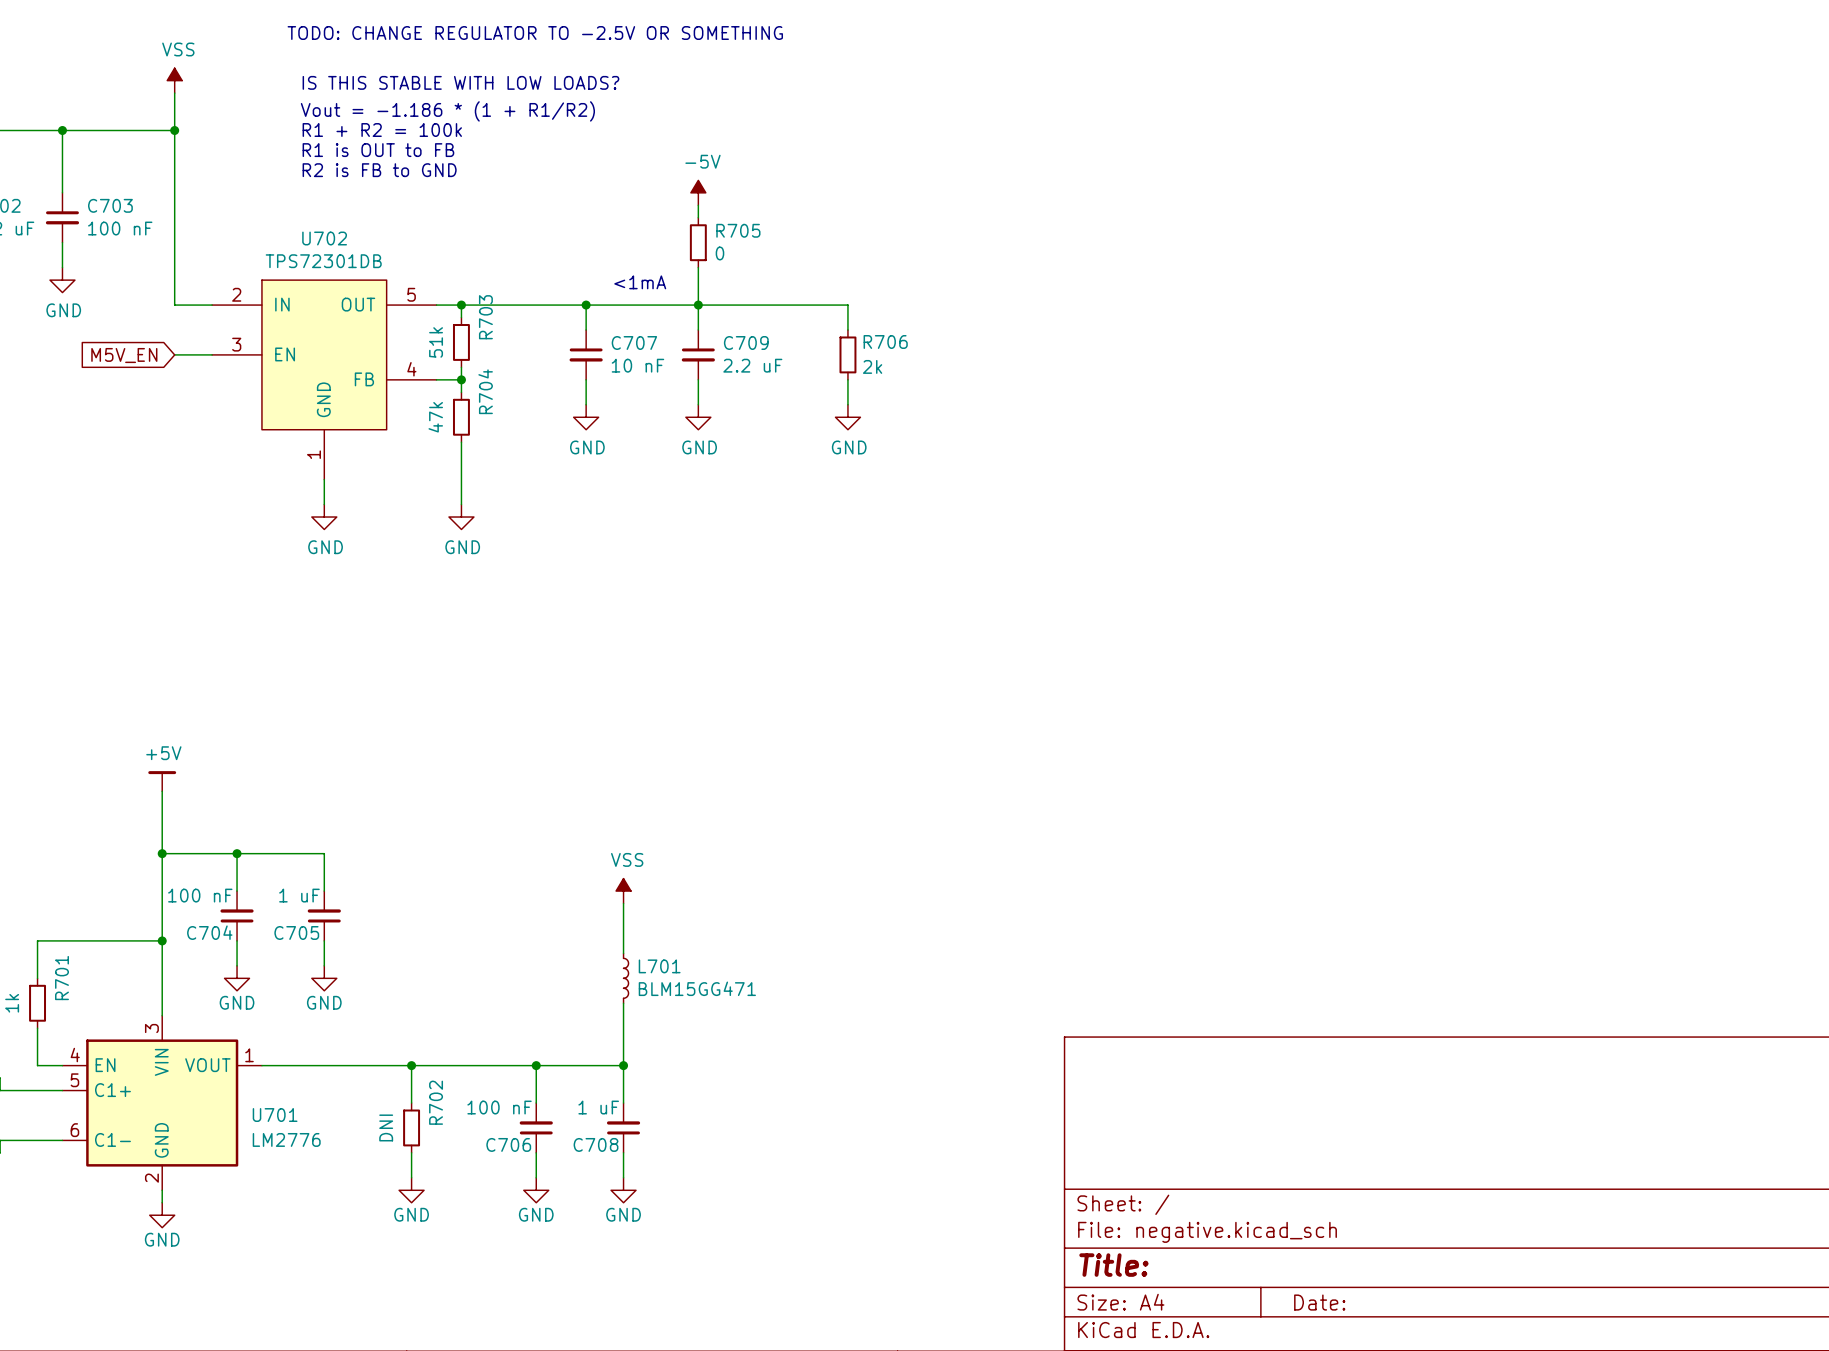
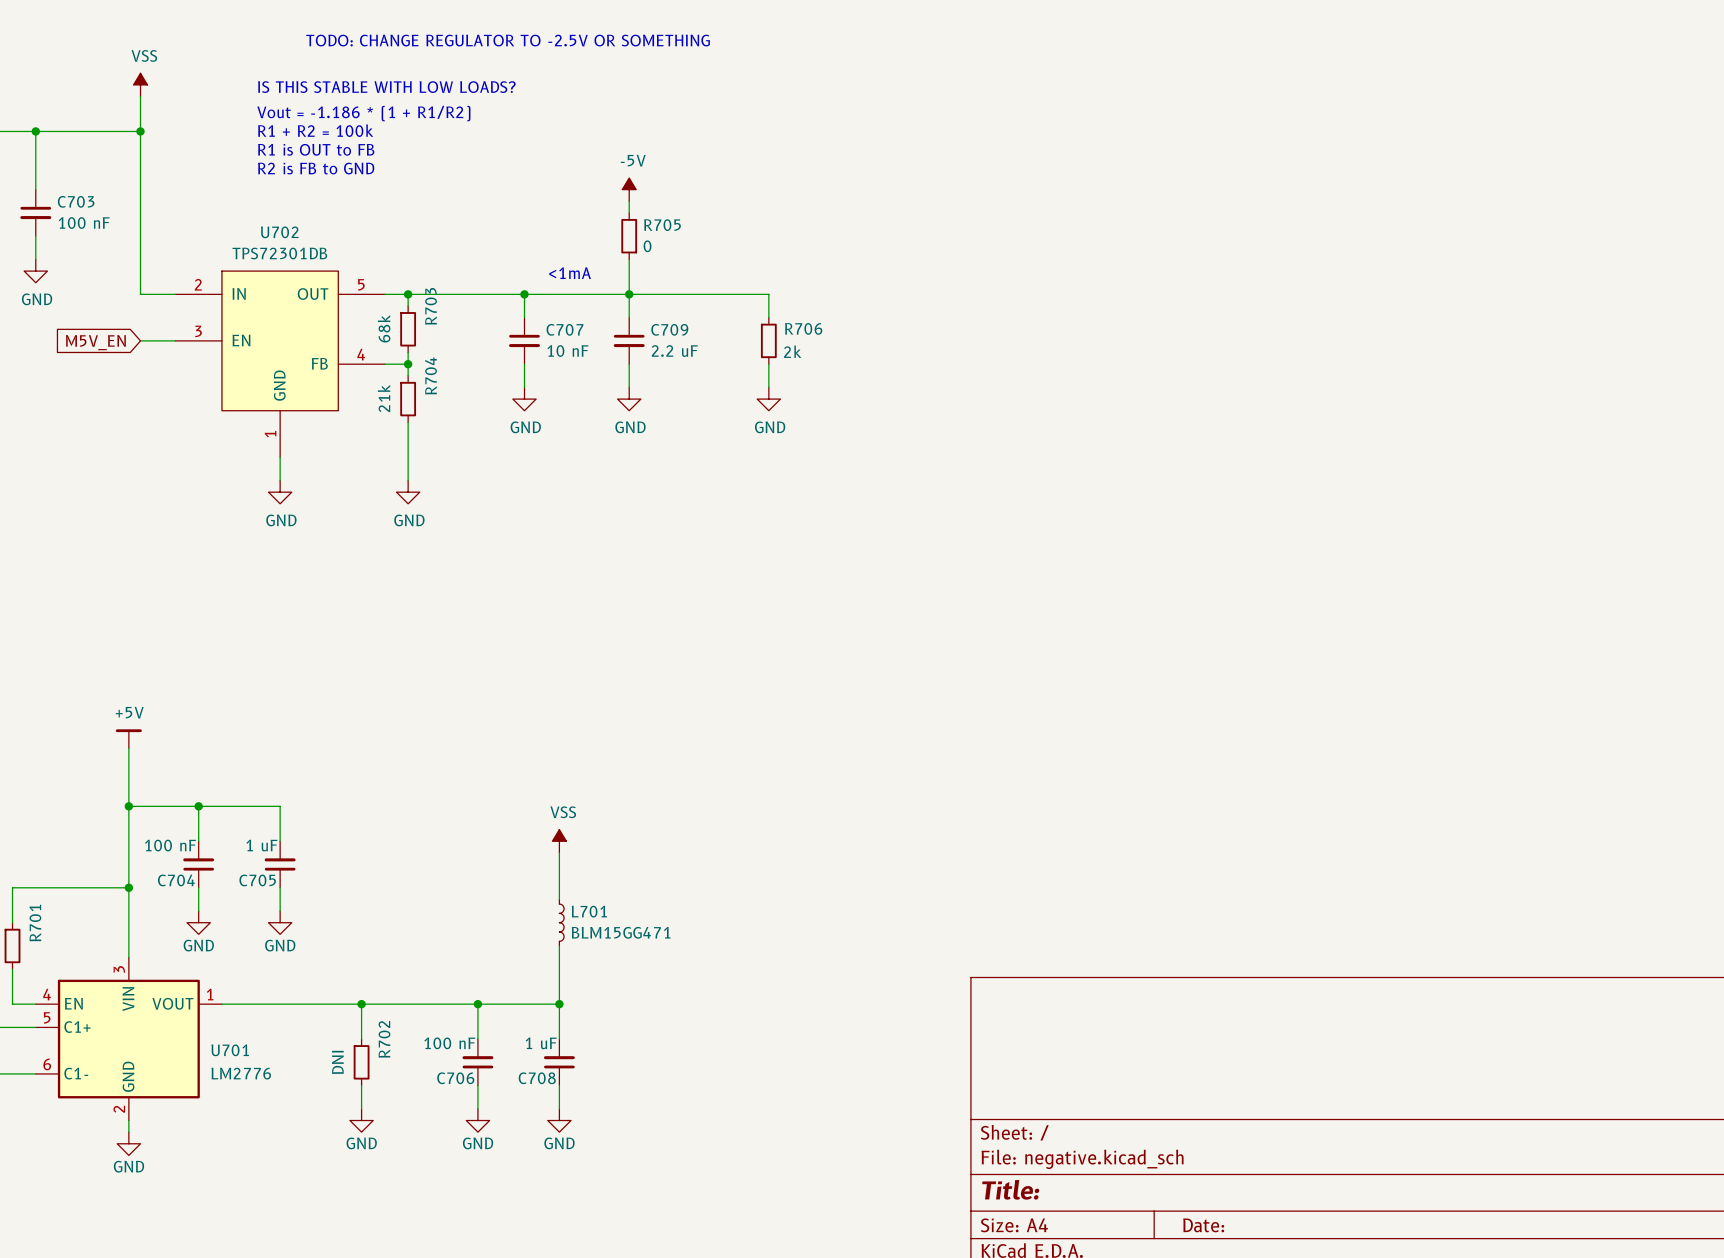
R703 value: 51k (436, 342) -> 68k (384, 328)
R704 value: 47k (435, 417) -> 21k (384, 398)

